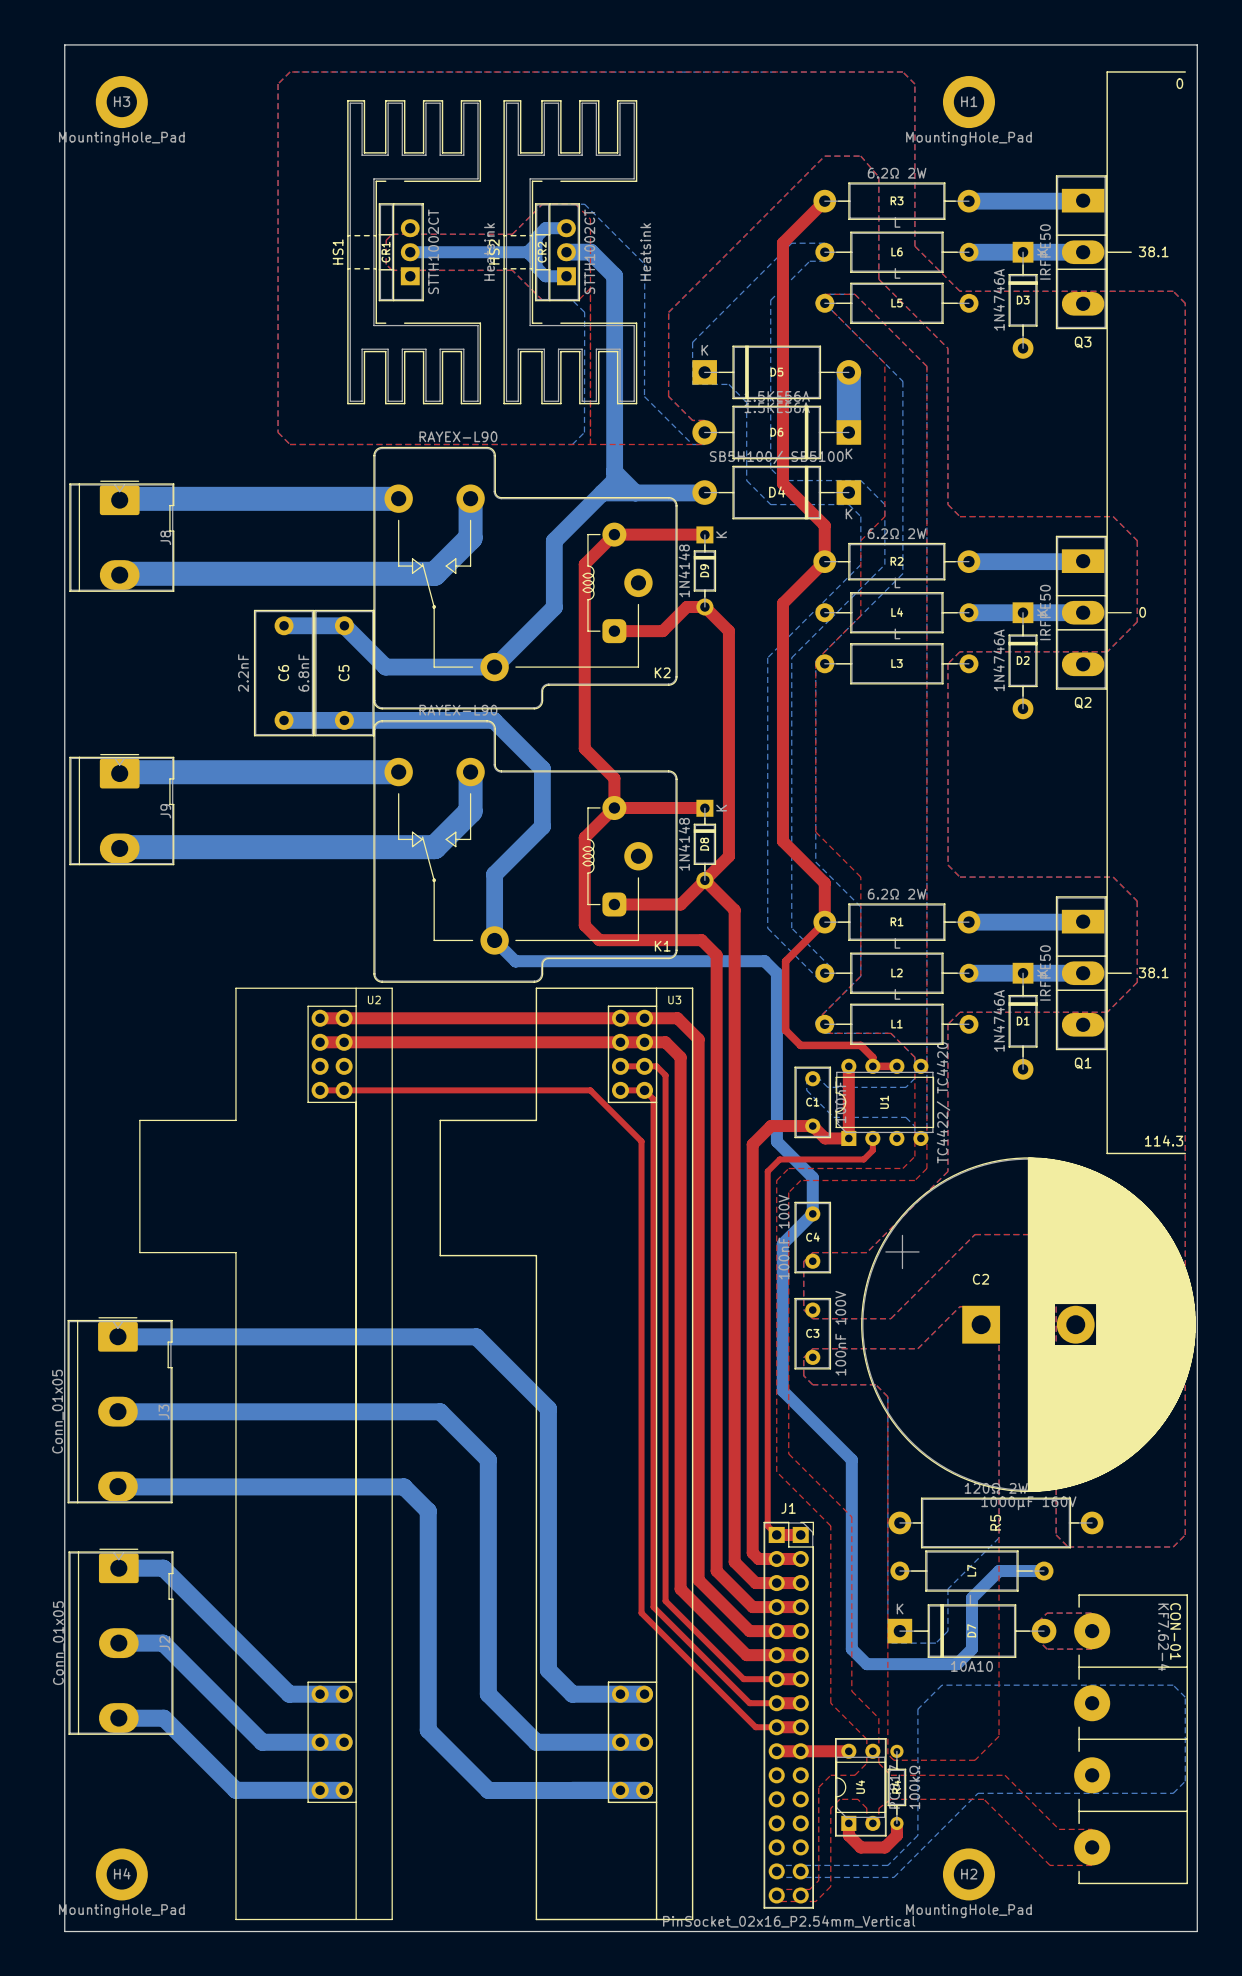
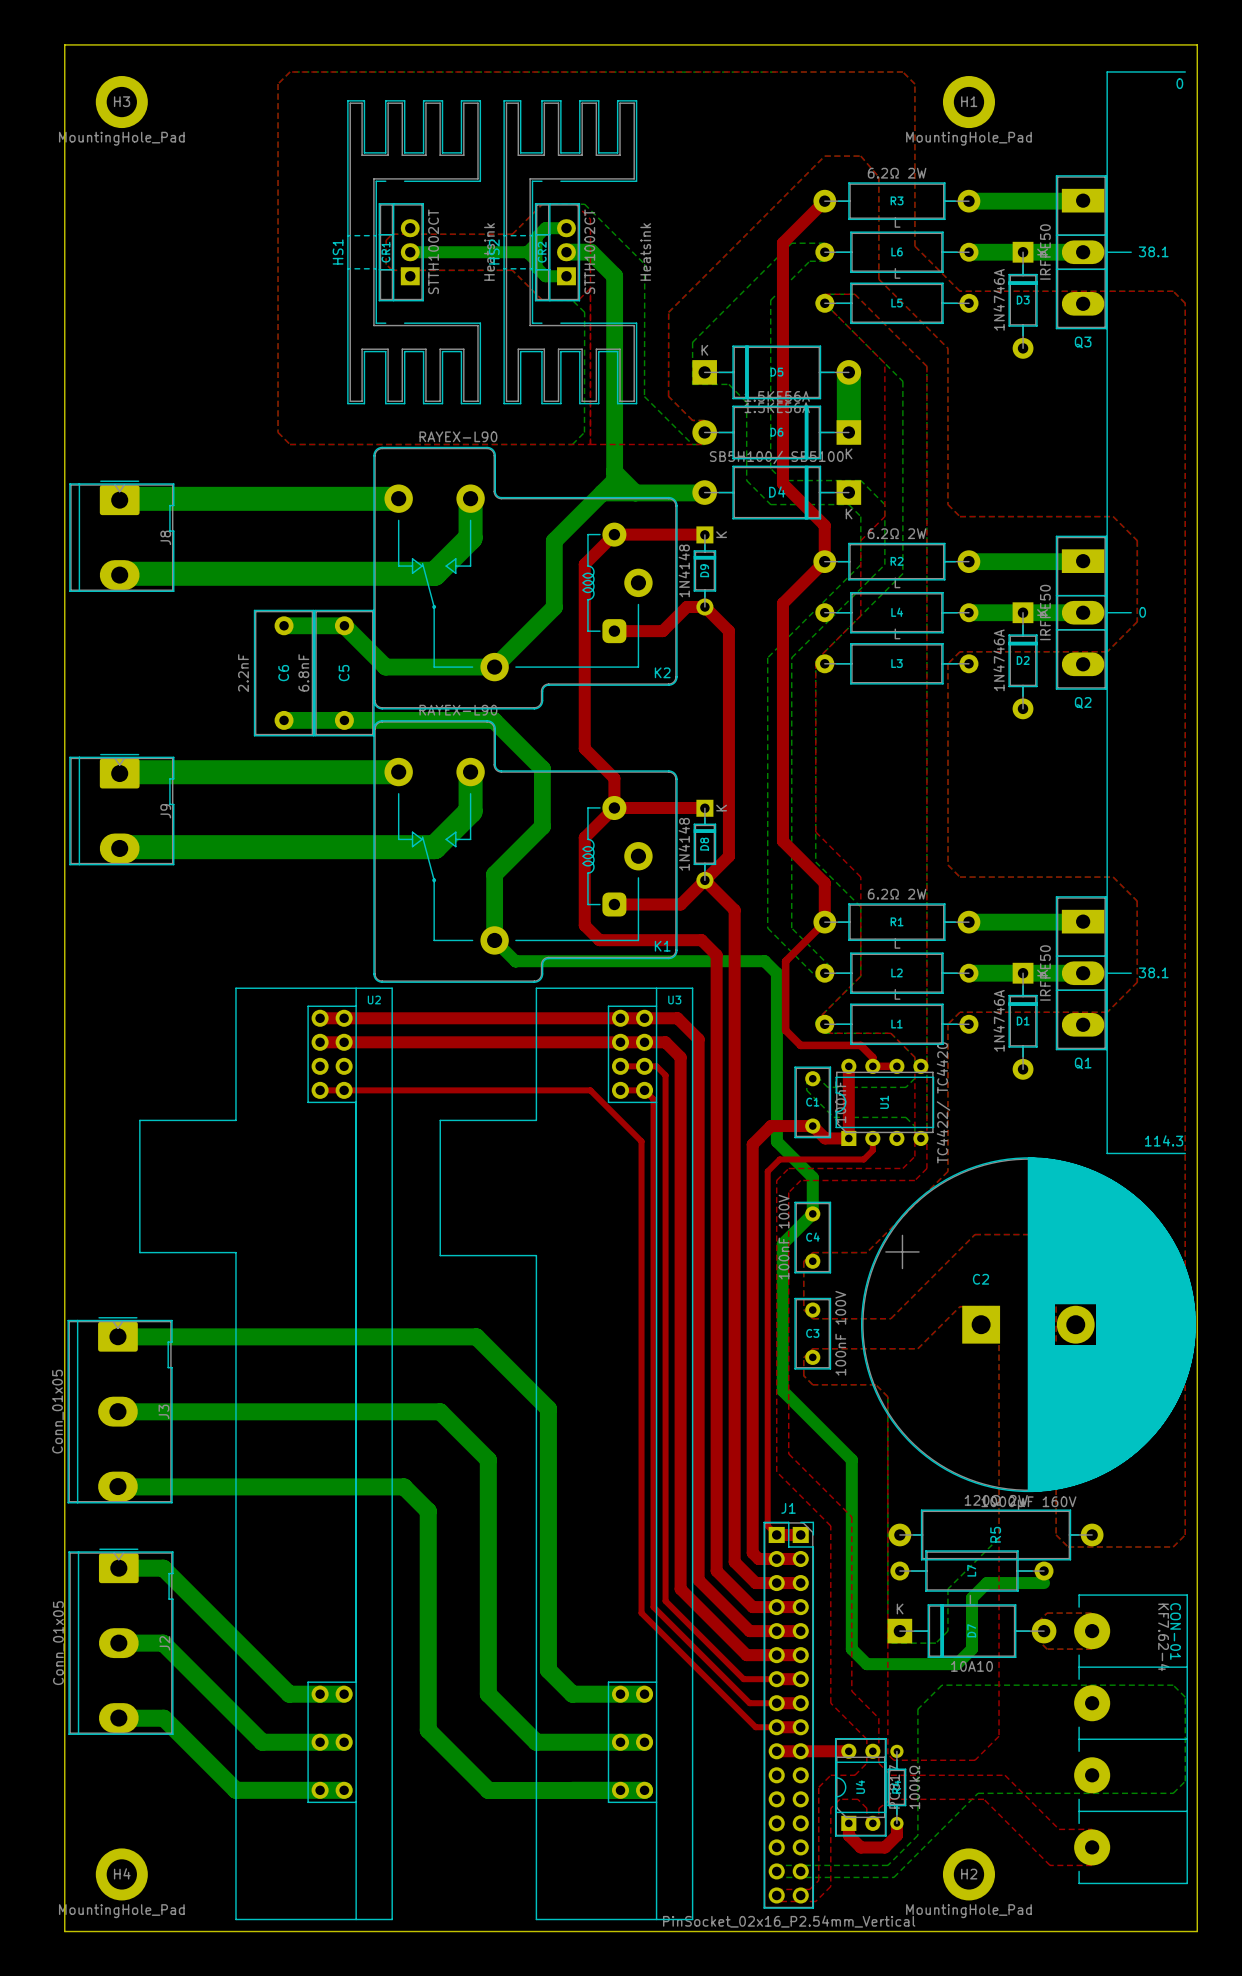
R5 position: (996, 1522) -> (996, 1534)
bottom track: (1044, 1571) (999, 1571) (987, 1583) -> (1044, 1583) (987, 1583)

